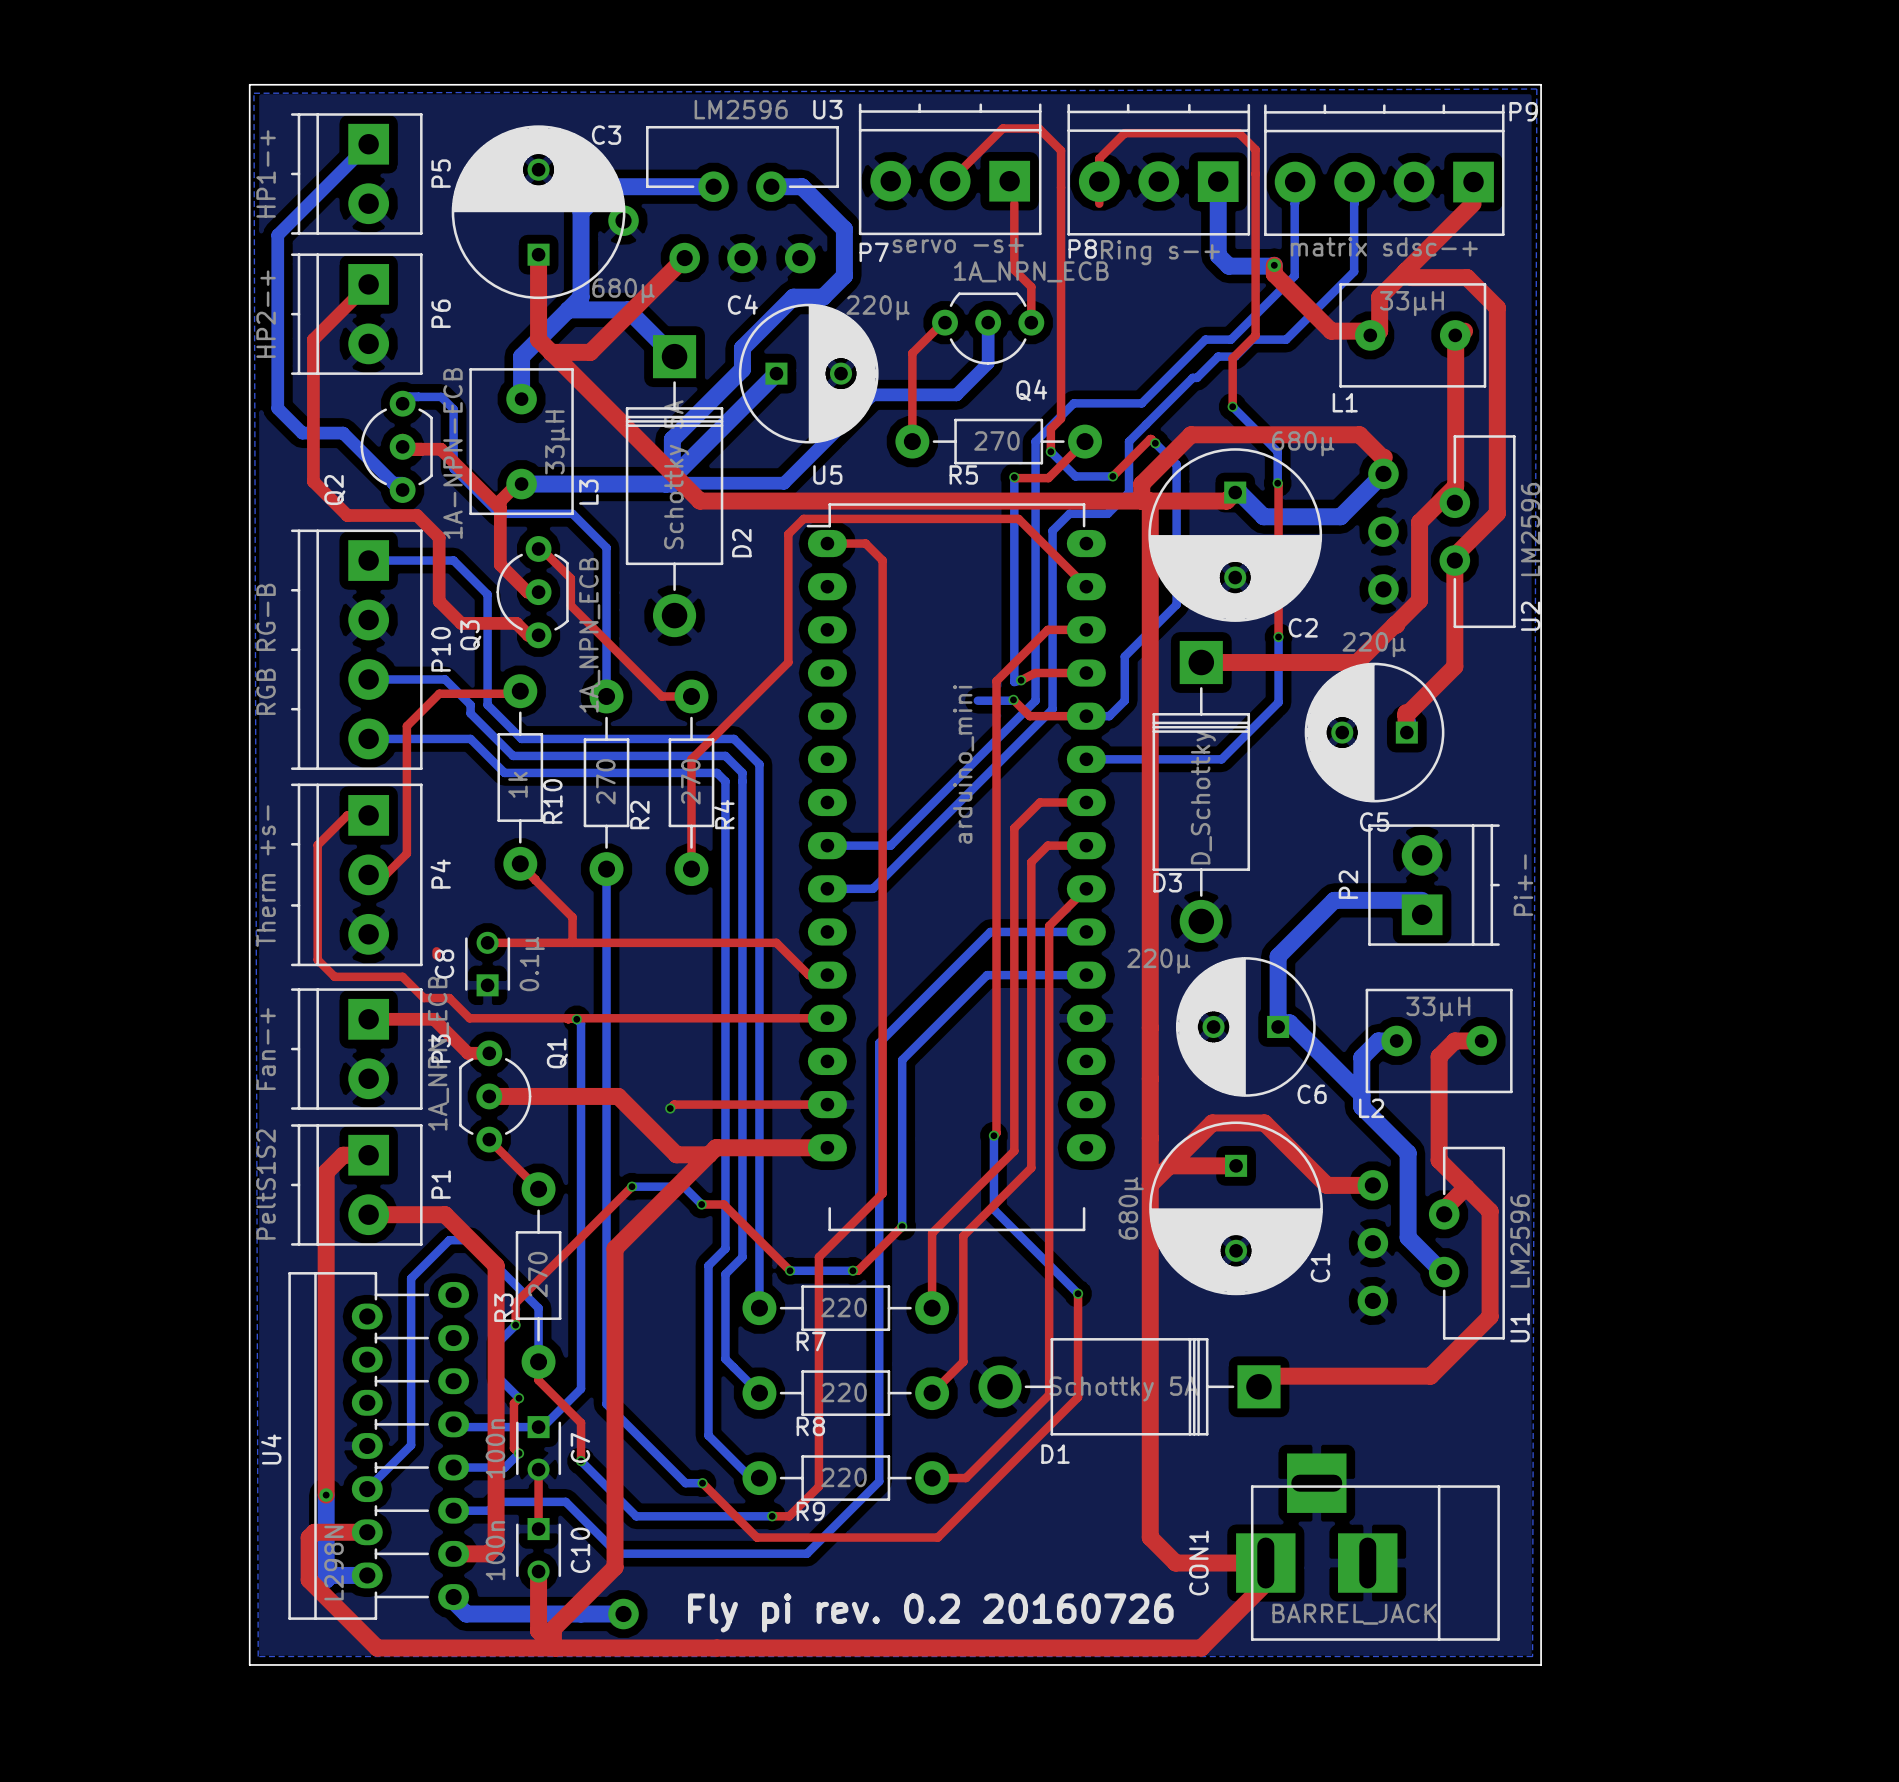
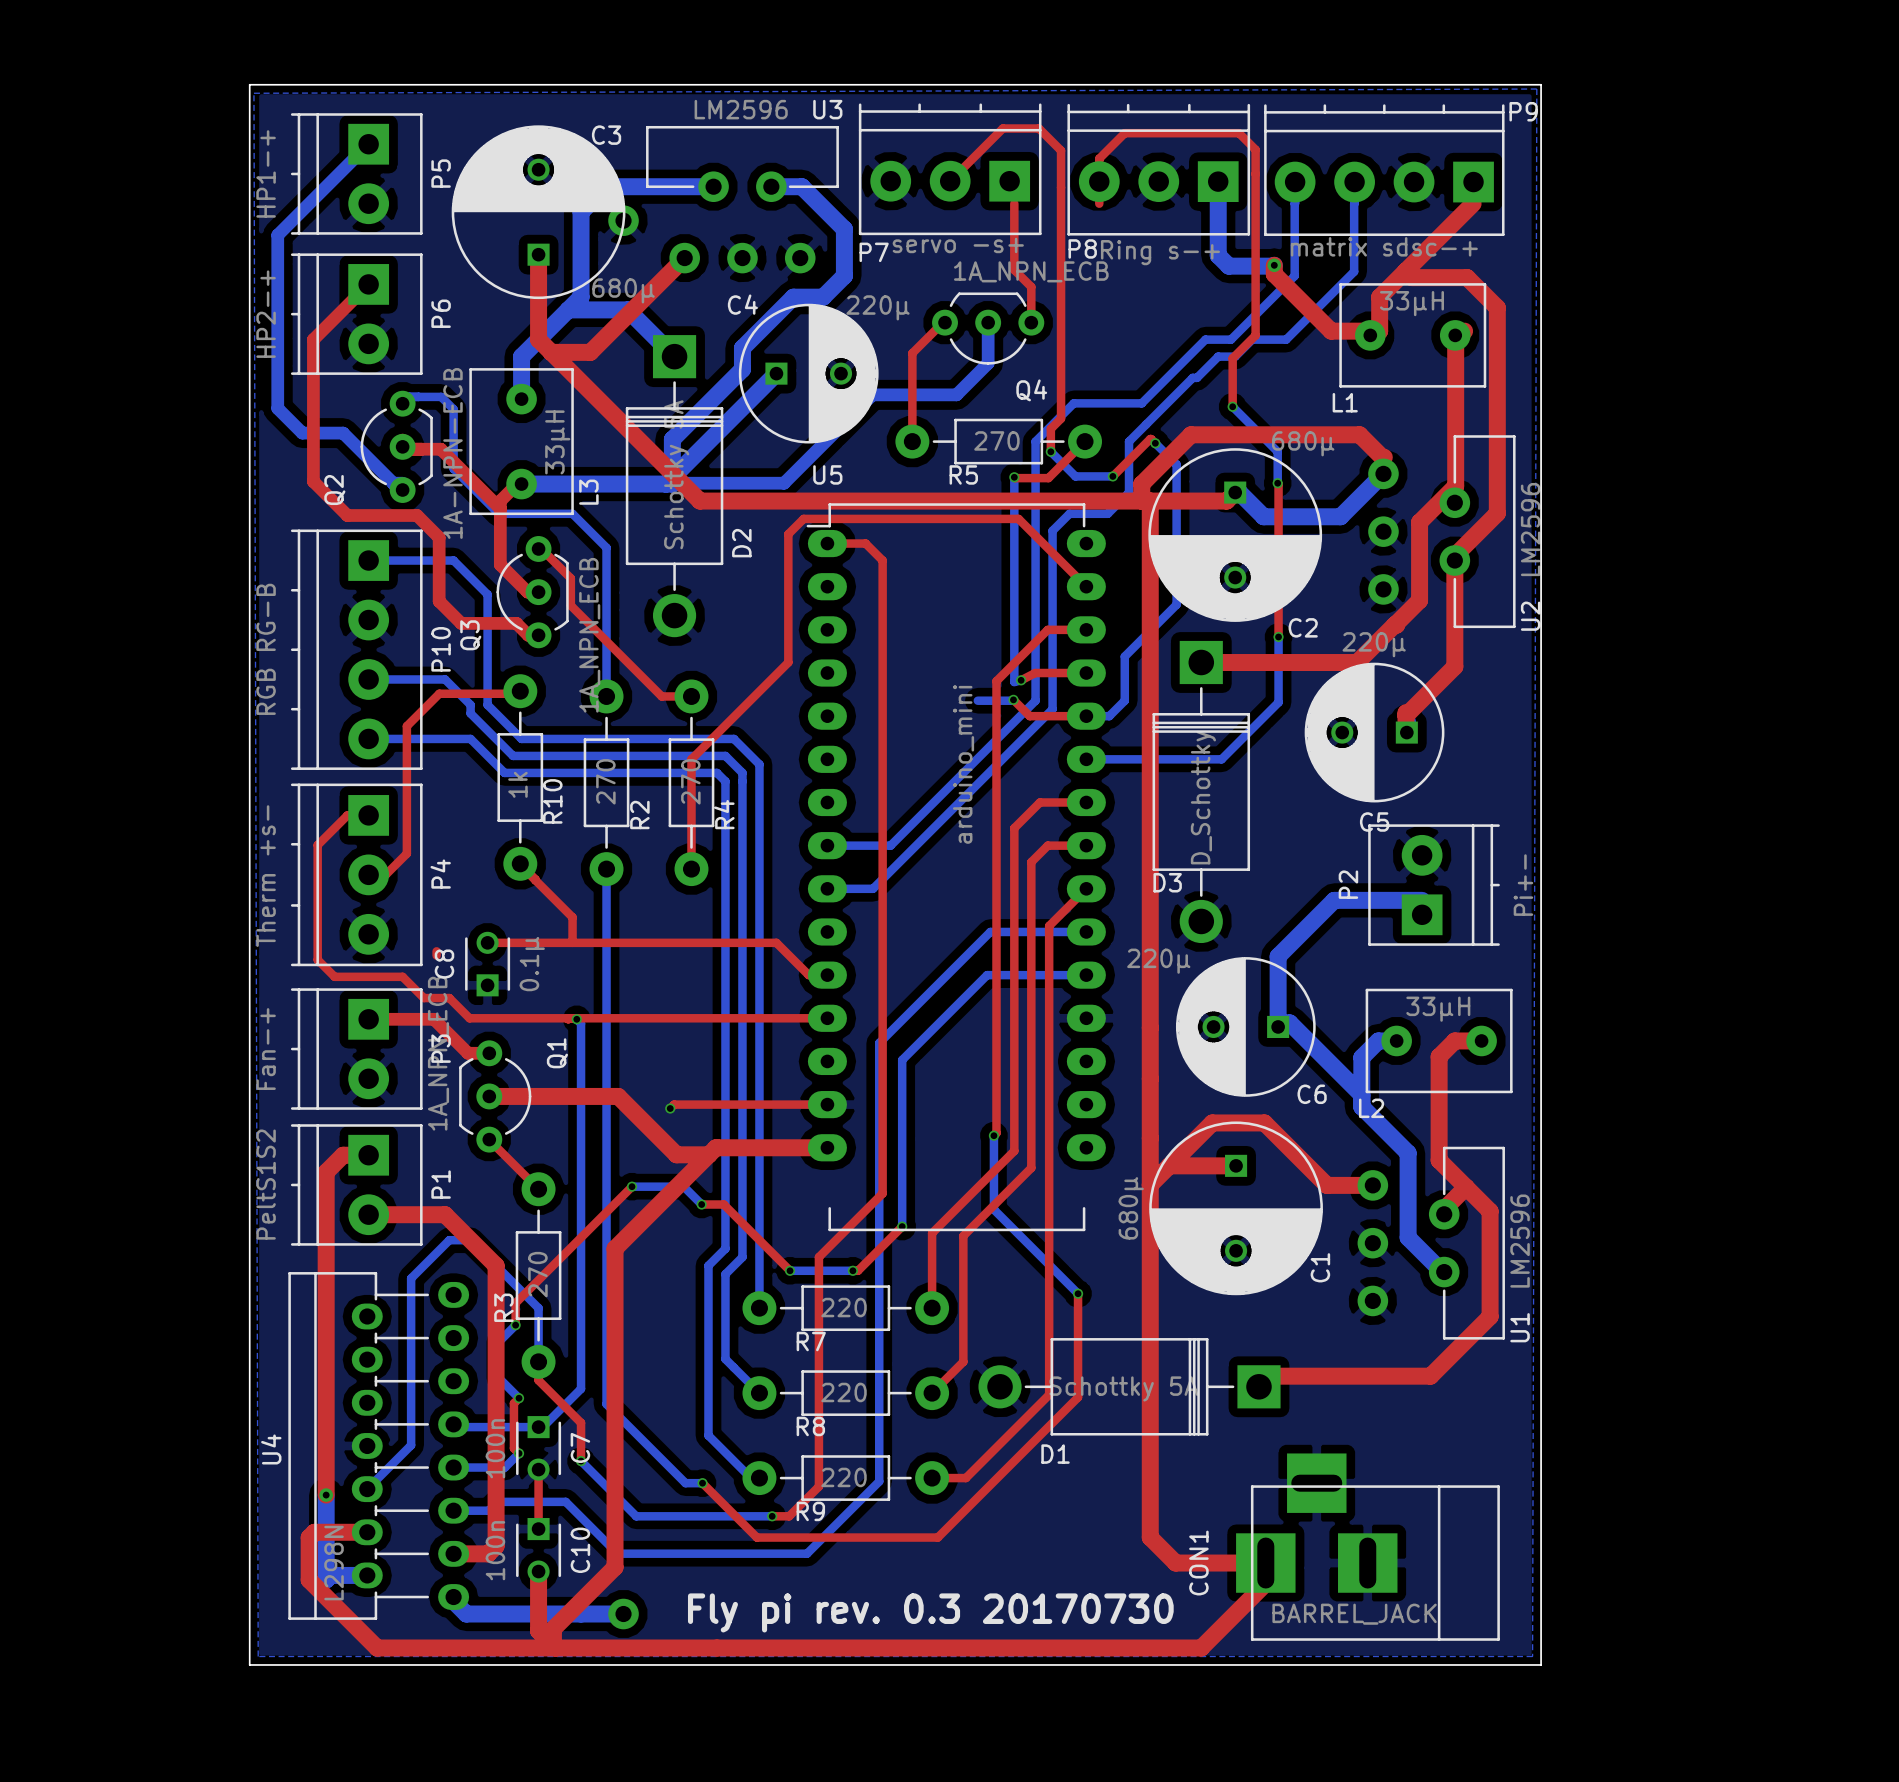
text: Fly pi rev. 0.2 20160726 (930, 1612) -> Fly pi rev. 0.3 20170730 (930, 1612)

